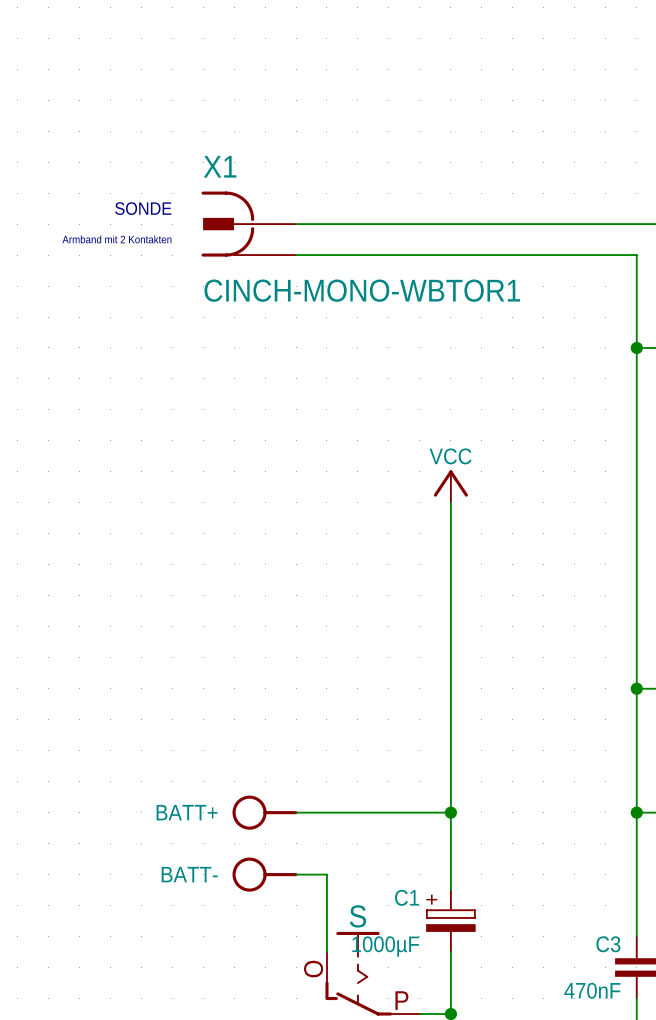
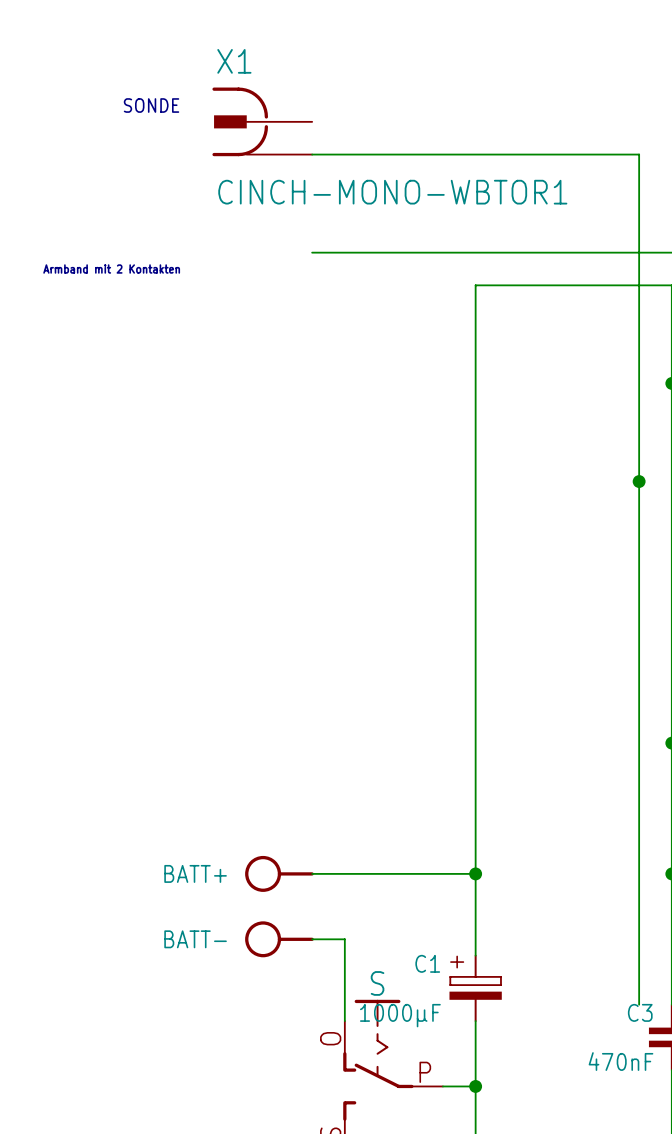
wire: none -> (312, 154) (639, 154) (639, 1004)
text position: SONDE (143, 208) -> SONDE (151, 105)
X1 position: (248, 224) -> (262, 121)
wire: (296, 255) (450, 255) -> (475, 546) (475, 285)
junction: none -> (639, 481)
power symbol: VCC (450, 486) -> none

